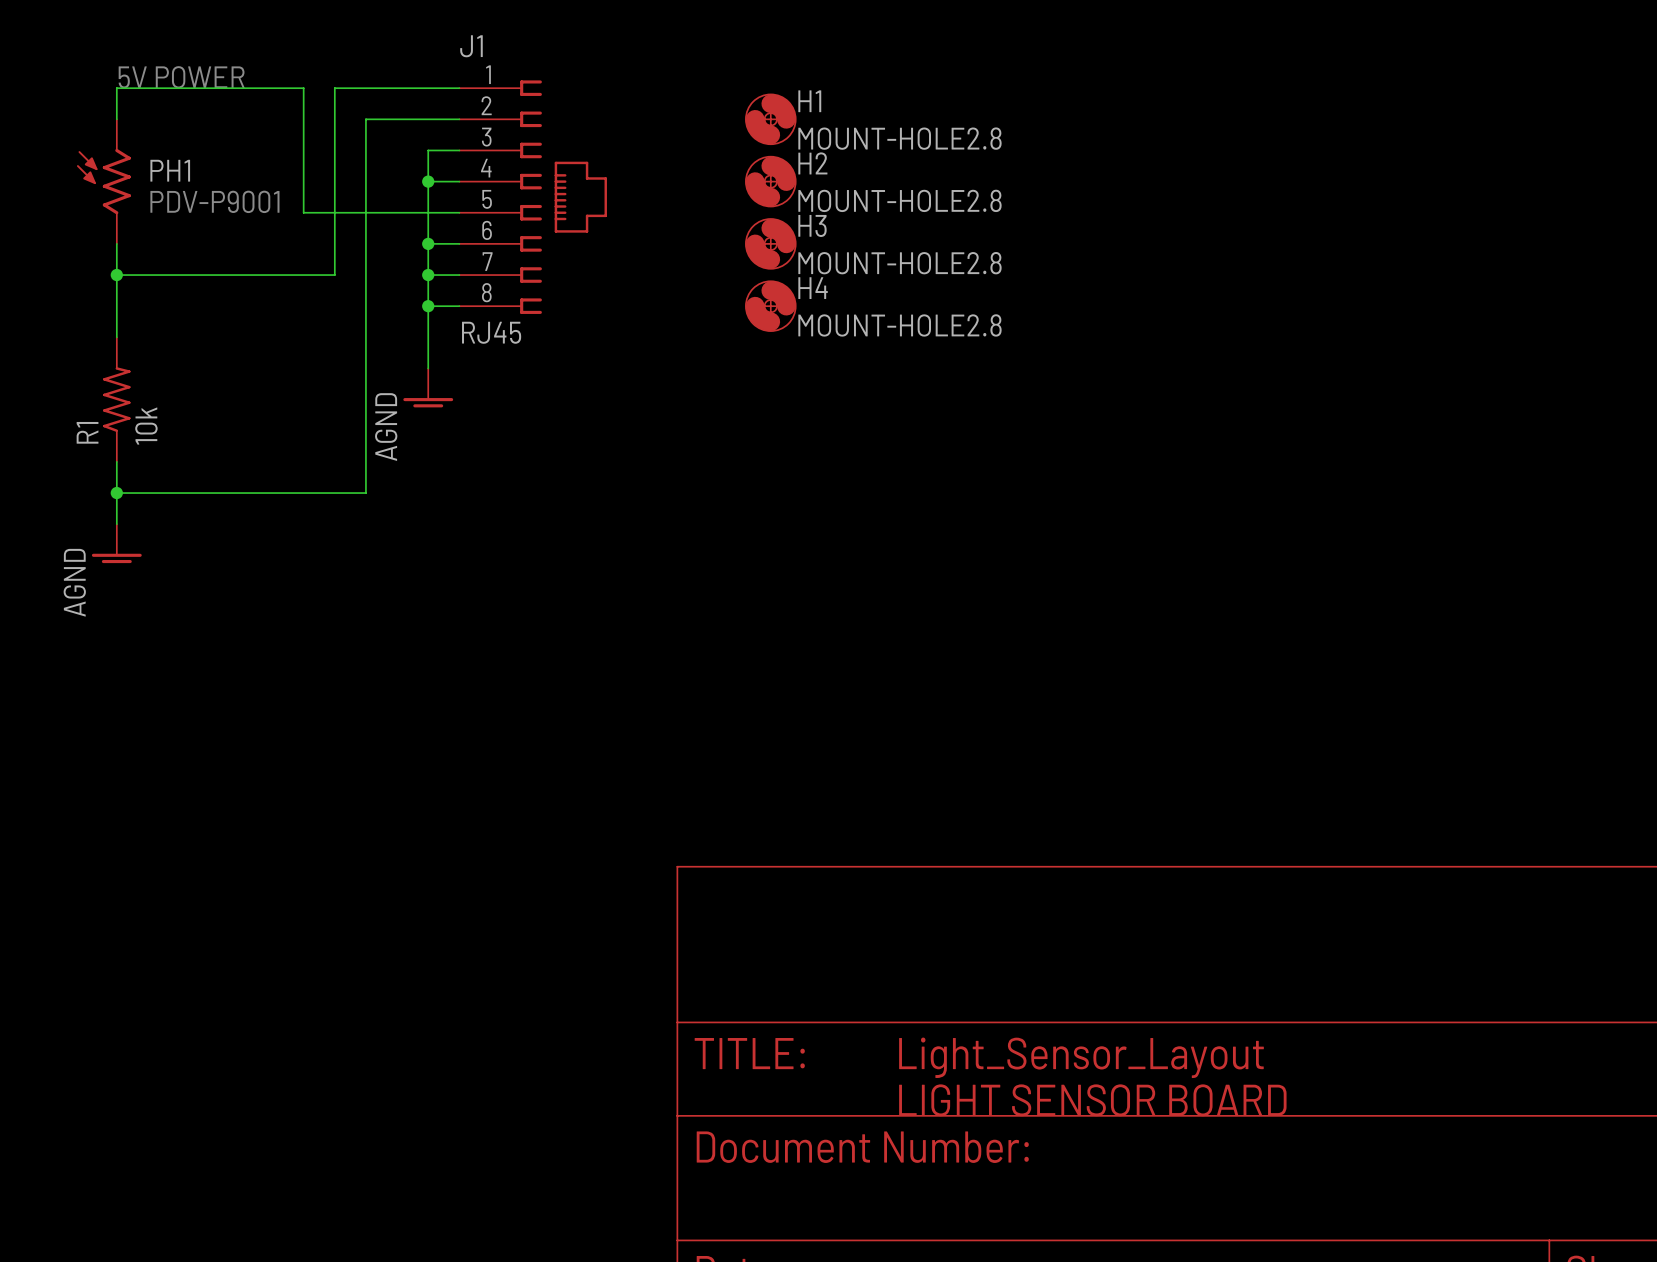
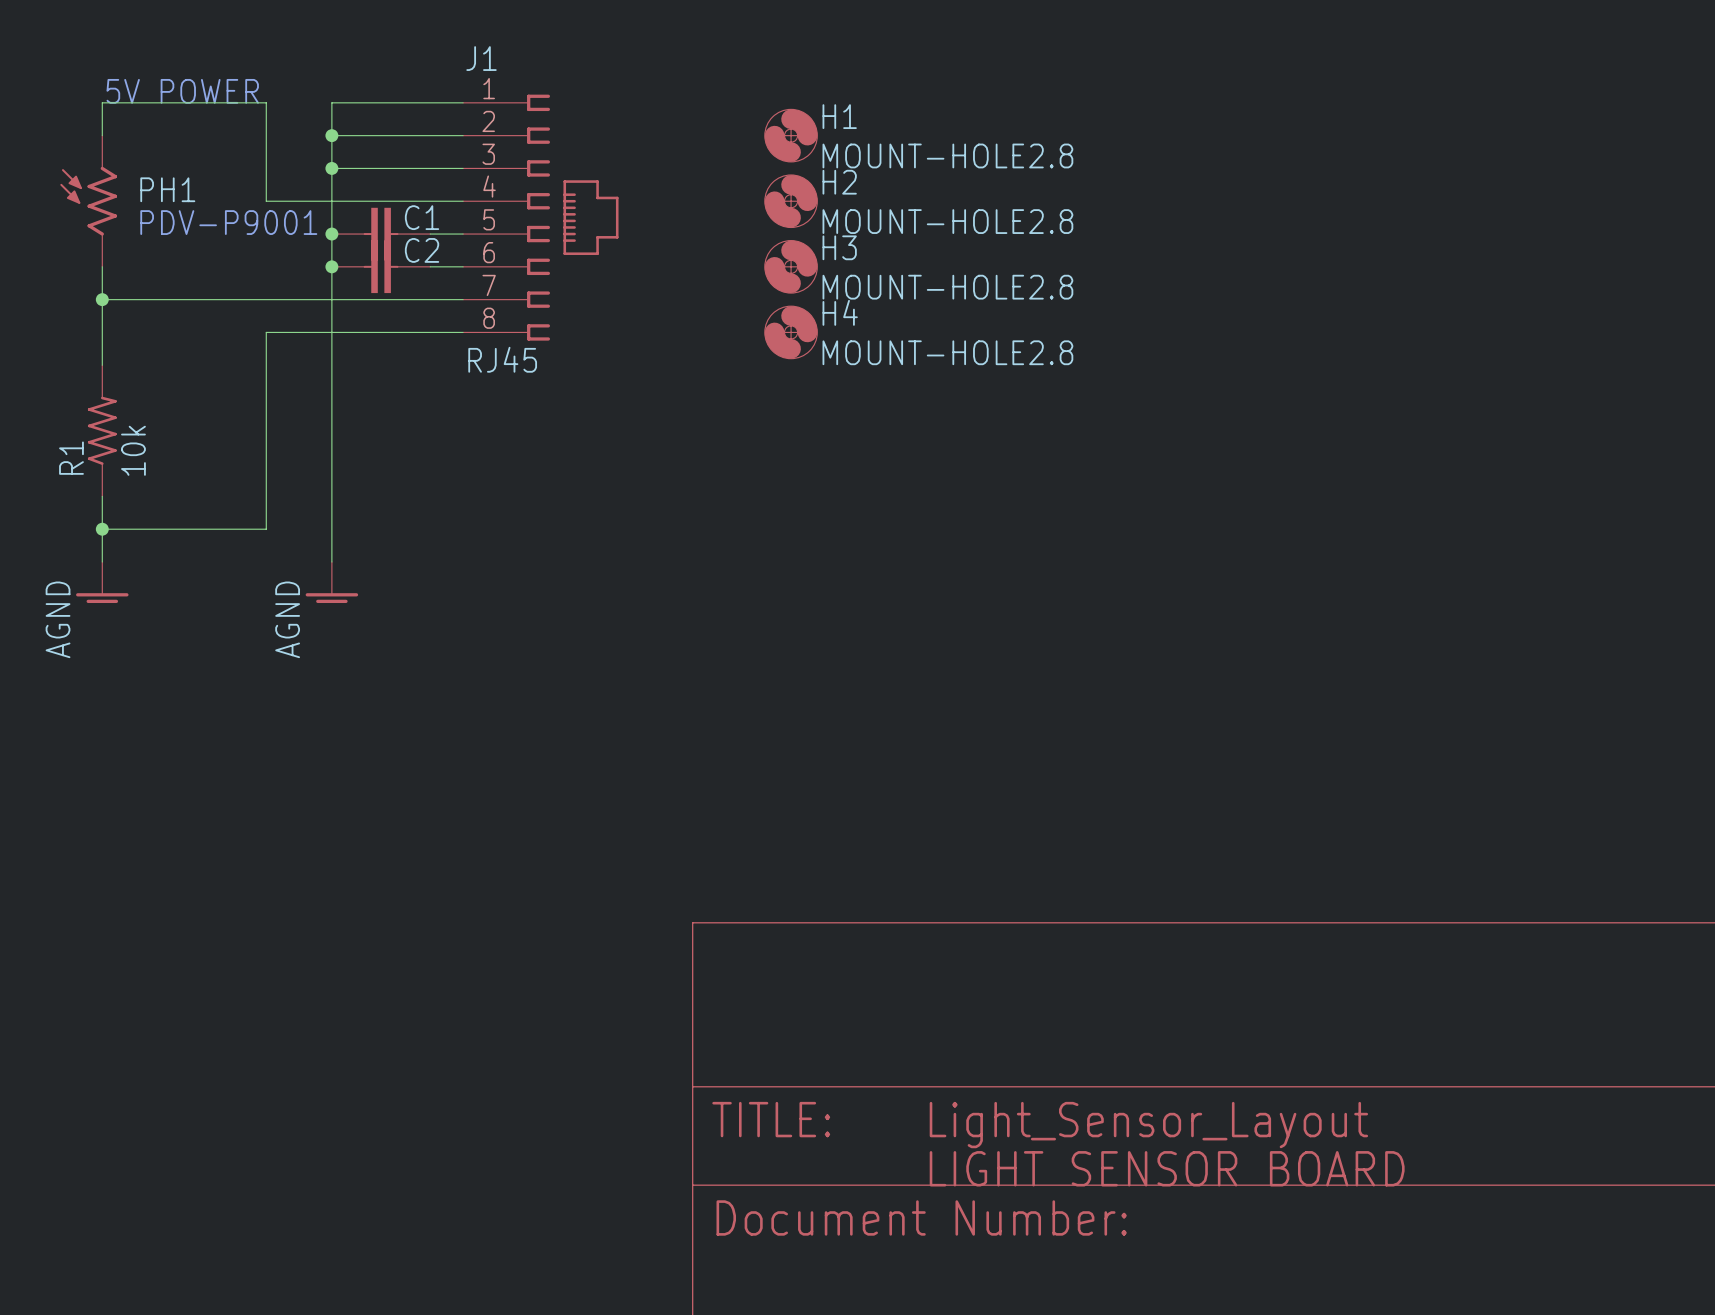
wire: (272, 88) (303, 88) (303, 212) (428, 212) -> (266, 102) (266, 201) (430, 201)
wire: none -> (331, 135) (364, 135)
junction: none -> (331, 135)
wire: (365, 119) (365, 493) (272, 493) -> (430, 332) (266, 332) (266, 529)
junction: none -> (331, 168)
wire: (428, 150) (428, 368) -> (430, 168) (331, 168)
junction: (428, 181) -> none
junction: none -> (331, 234)
C1: none -> (381, 234)
junction: none -> (331, 266)
C2: none -> (381, 266)
junction: (428, 243) -> none
wire: none -> (430, 299) (331, 299) (331, 562)
junction: (428, 275) -> none
junction: (428, 306) -> none
power symbol position: AGND (428, 387) -> AGND (331, 582)

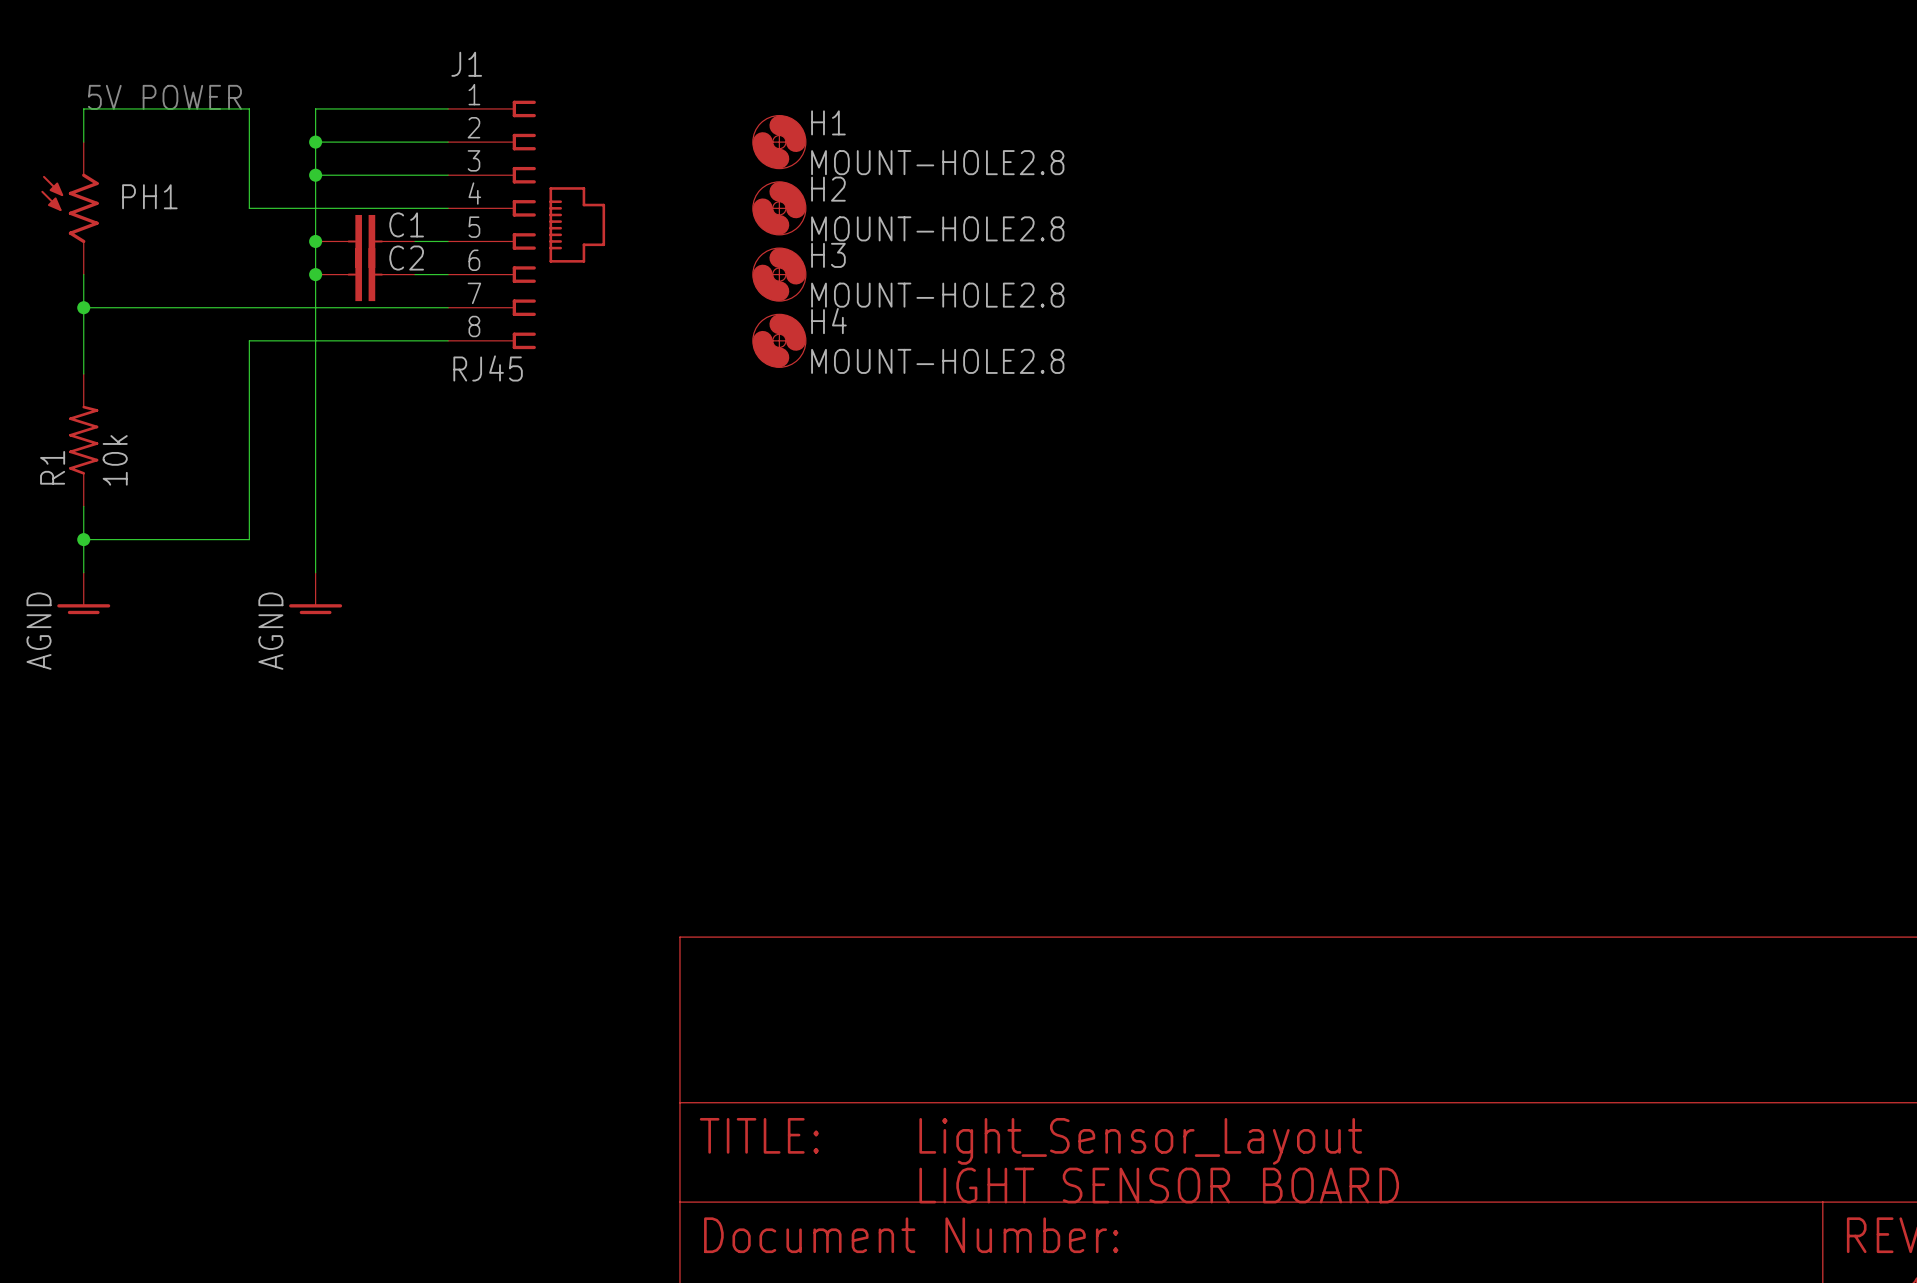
text: PDV-P9001 (228, 222) -> none

